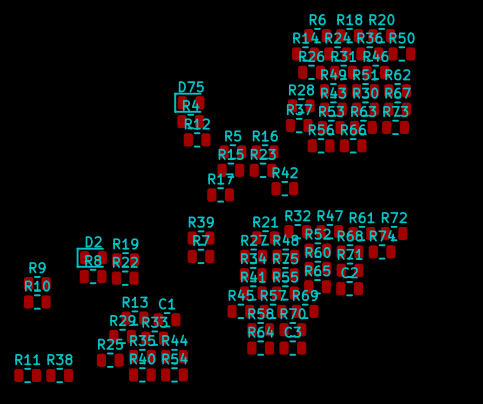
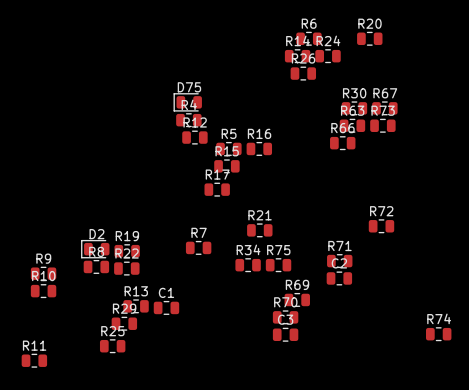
R18: (349, 35) -> none
R36: (369, 53) -> none
R50: (401, 53) -> none
R31: (343, 72) -> none
R46: (375, 72) -> none
R49: (333, 90) -> none
R51: (365, 90) -> none
R62: (397, 90) -> none
R28: (301, 105) -> none
R43: (333, 109) -> none
R37: (299, 125) -> none
R53: (331, 127) -> none
R56: (321, 145) -> none
R23: (263, 170) -> none
R42: (284, 188) -> none
R32: (297, 231) -> none
R47: (329, 231) -> none
R61: (361, 233) -> none
R39: (201, 238) -> none
R52: (317, 250) -> none
R68: (349, 251) -> none
R74 position: (382, 251) -> (438, 334)
R27: (253, 256) -> none
R48: (285, 256) -> none
R60: (317, 268) -> none
R65: (317, 286) -> none
R41: (253, 292) -> none
R55: (285, 292) -> none
R45: (240, 311) -> none
R57: (273, 311) -> none
R58: (260, 329) -> none
R33: (154, 338) -> none
R64: (260, 348) -> none
R35: (142, 356) -> none
R44: (174, 356) -> none
R40: (142, 374) -> none
R54: (174, 374) -> none
R38: (59, 375) -> none

